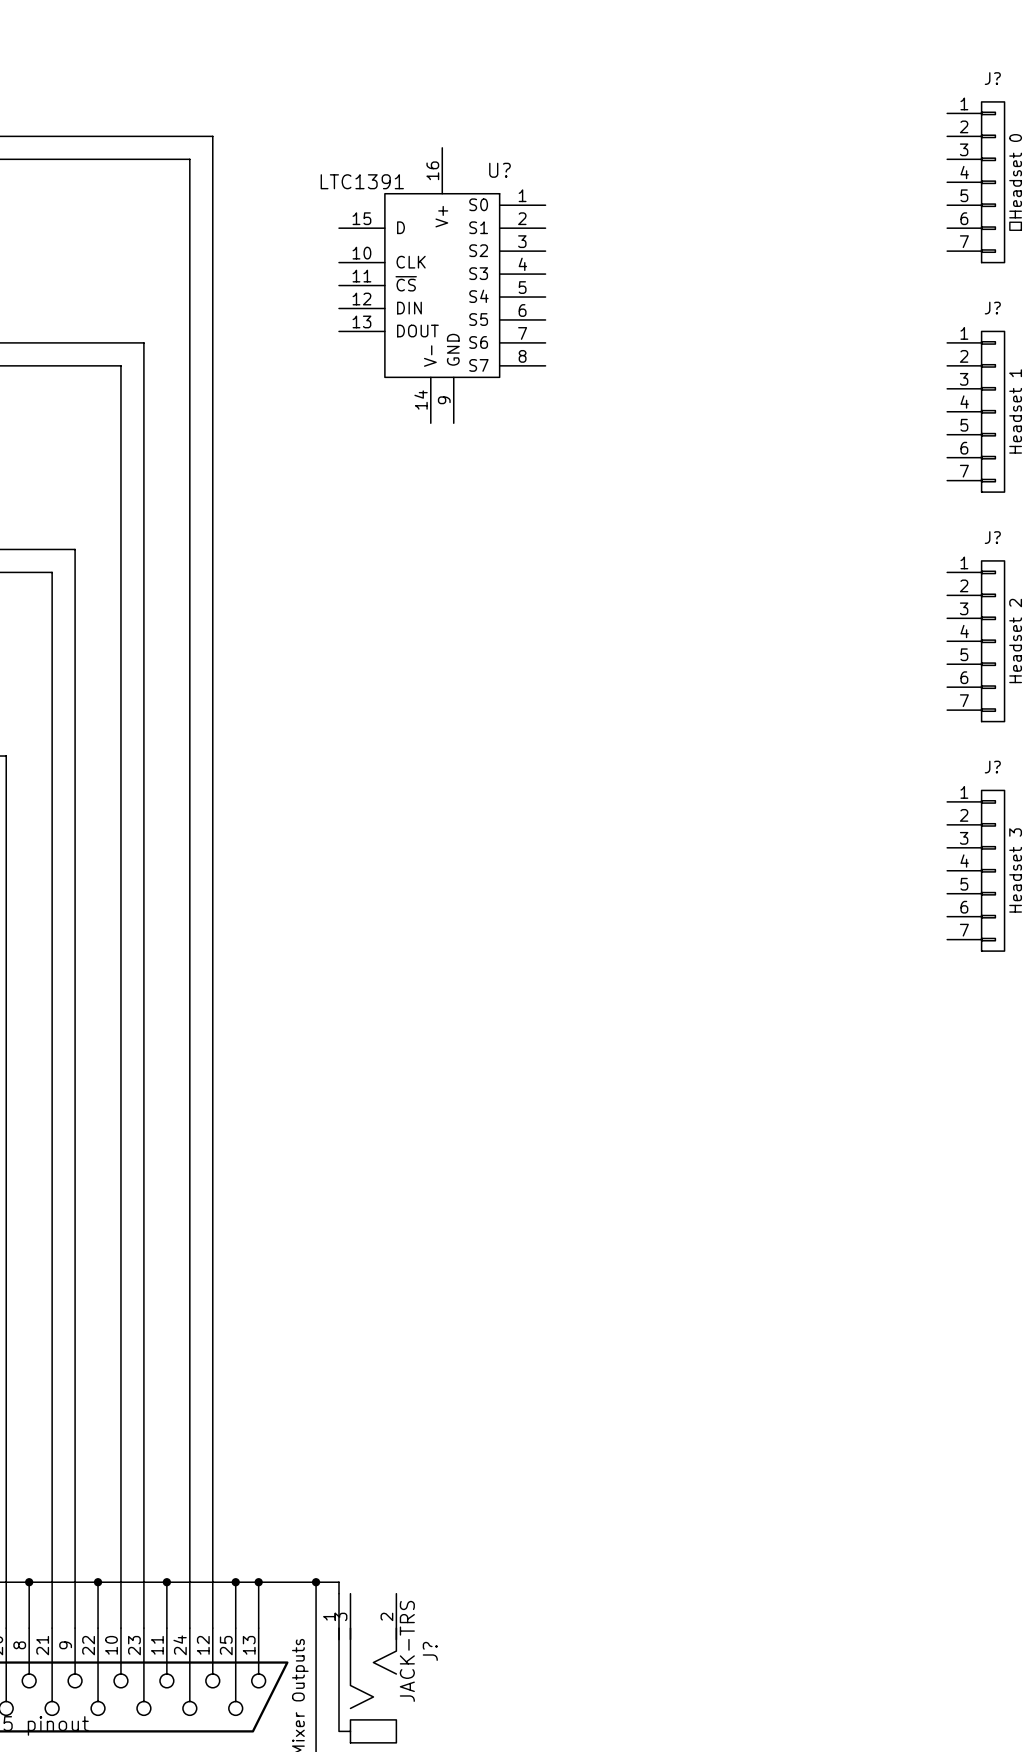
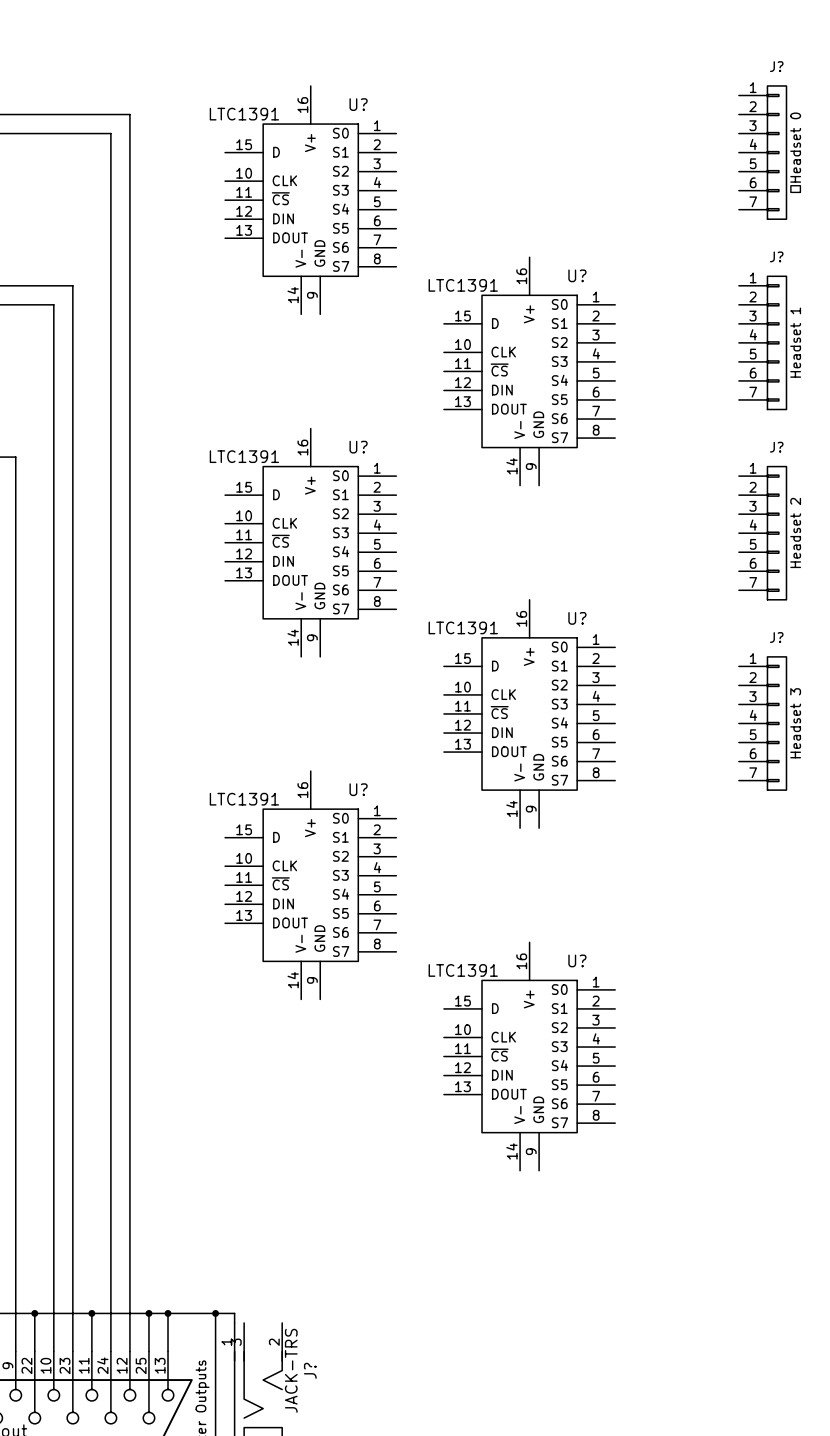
U? position: (442, 285) -> (310, 200)
U?: none -> LTC1391 (529, 371)
U?: none -> LTC1391 (310, 542)
U?: none -> LTC1391 (529, 713)
U?: none -> LTC1391 (310, 885)
U?: none -> LTC1391 (529, 1056)

